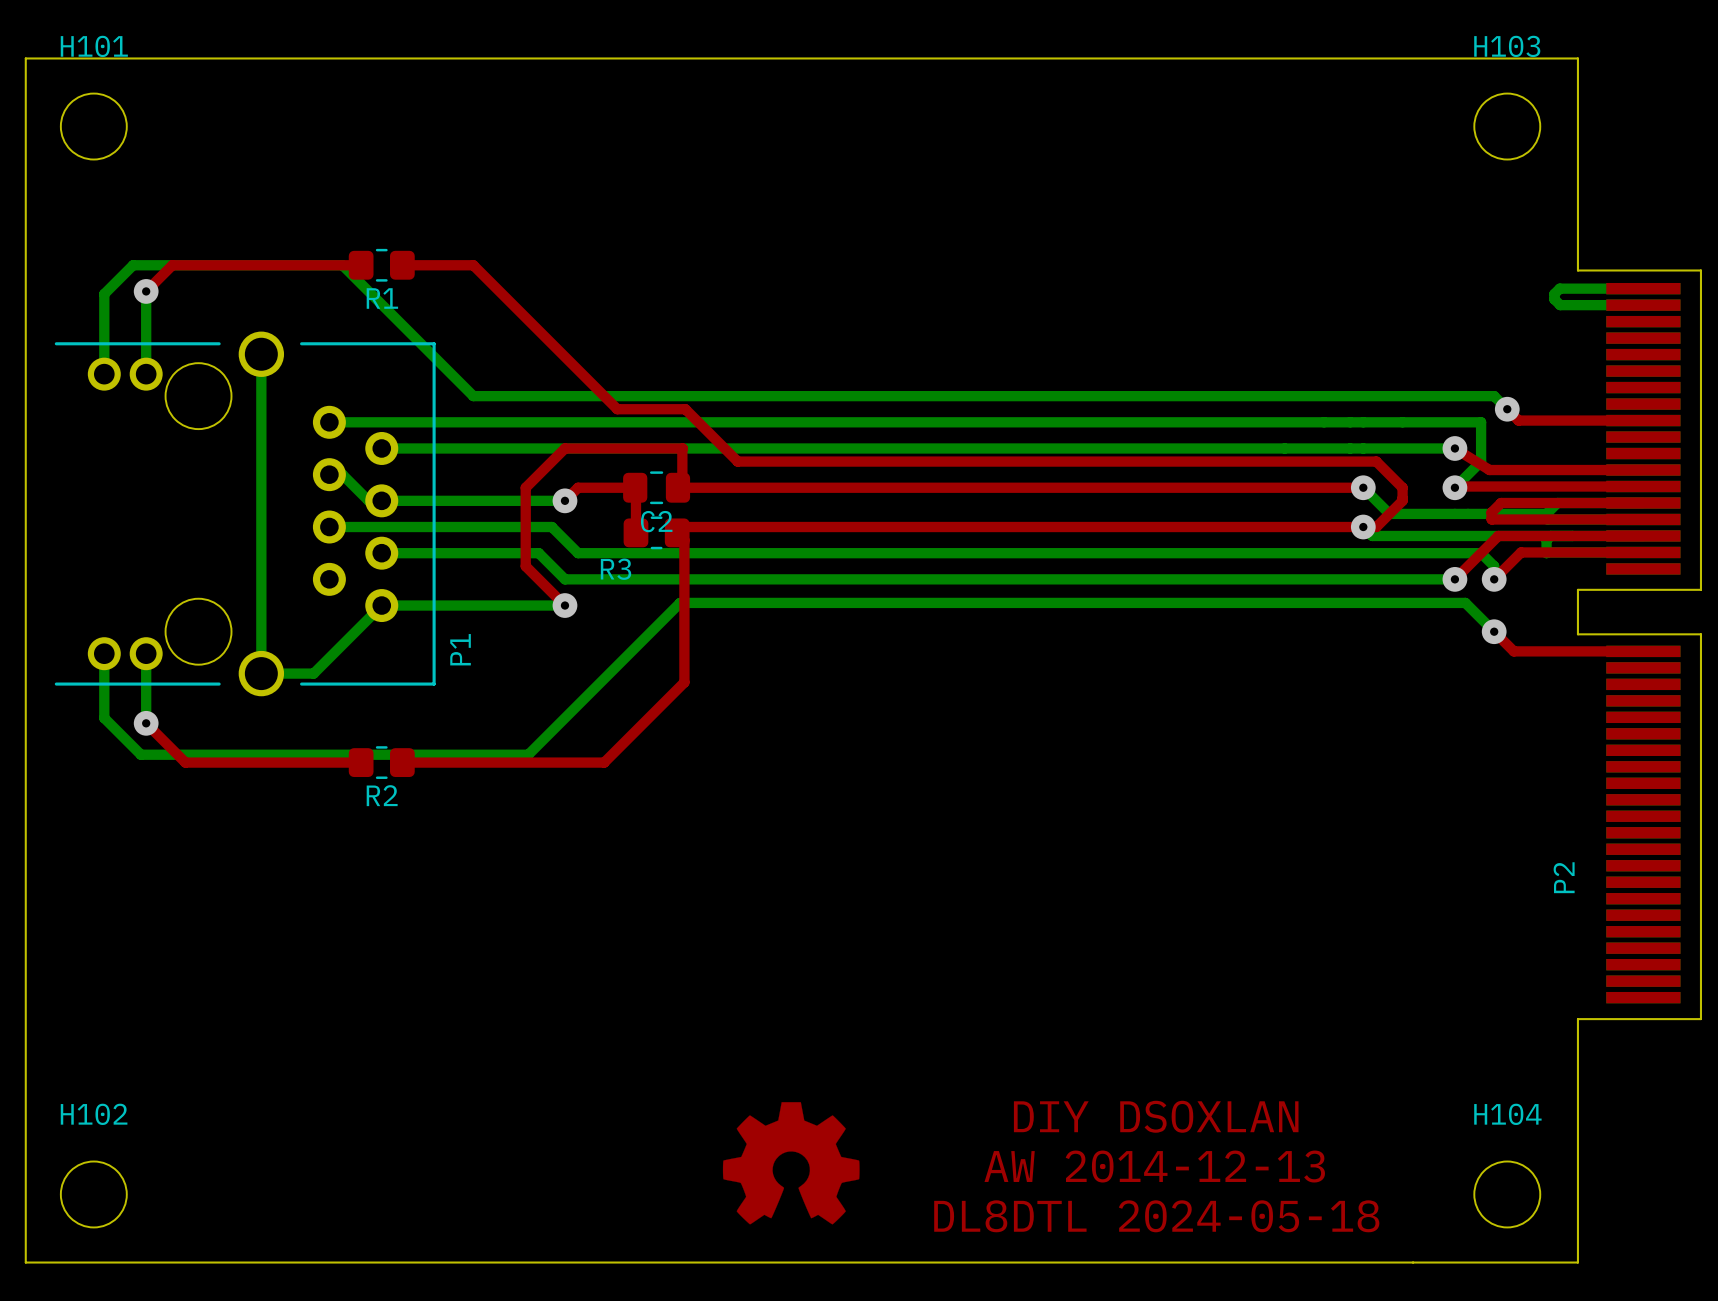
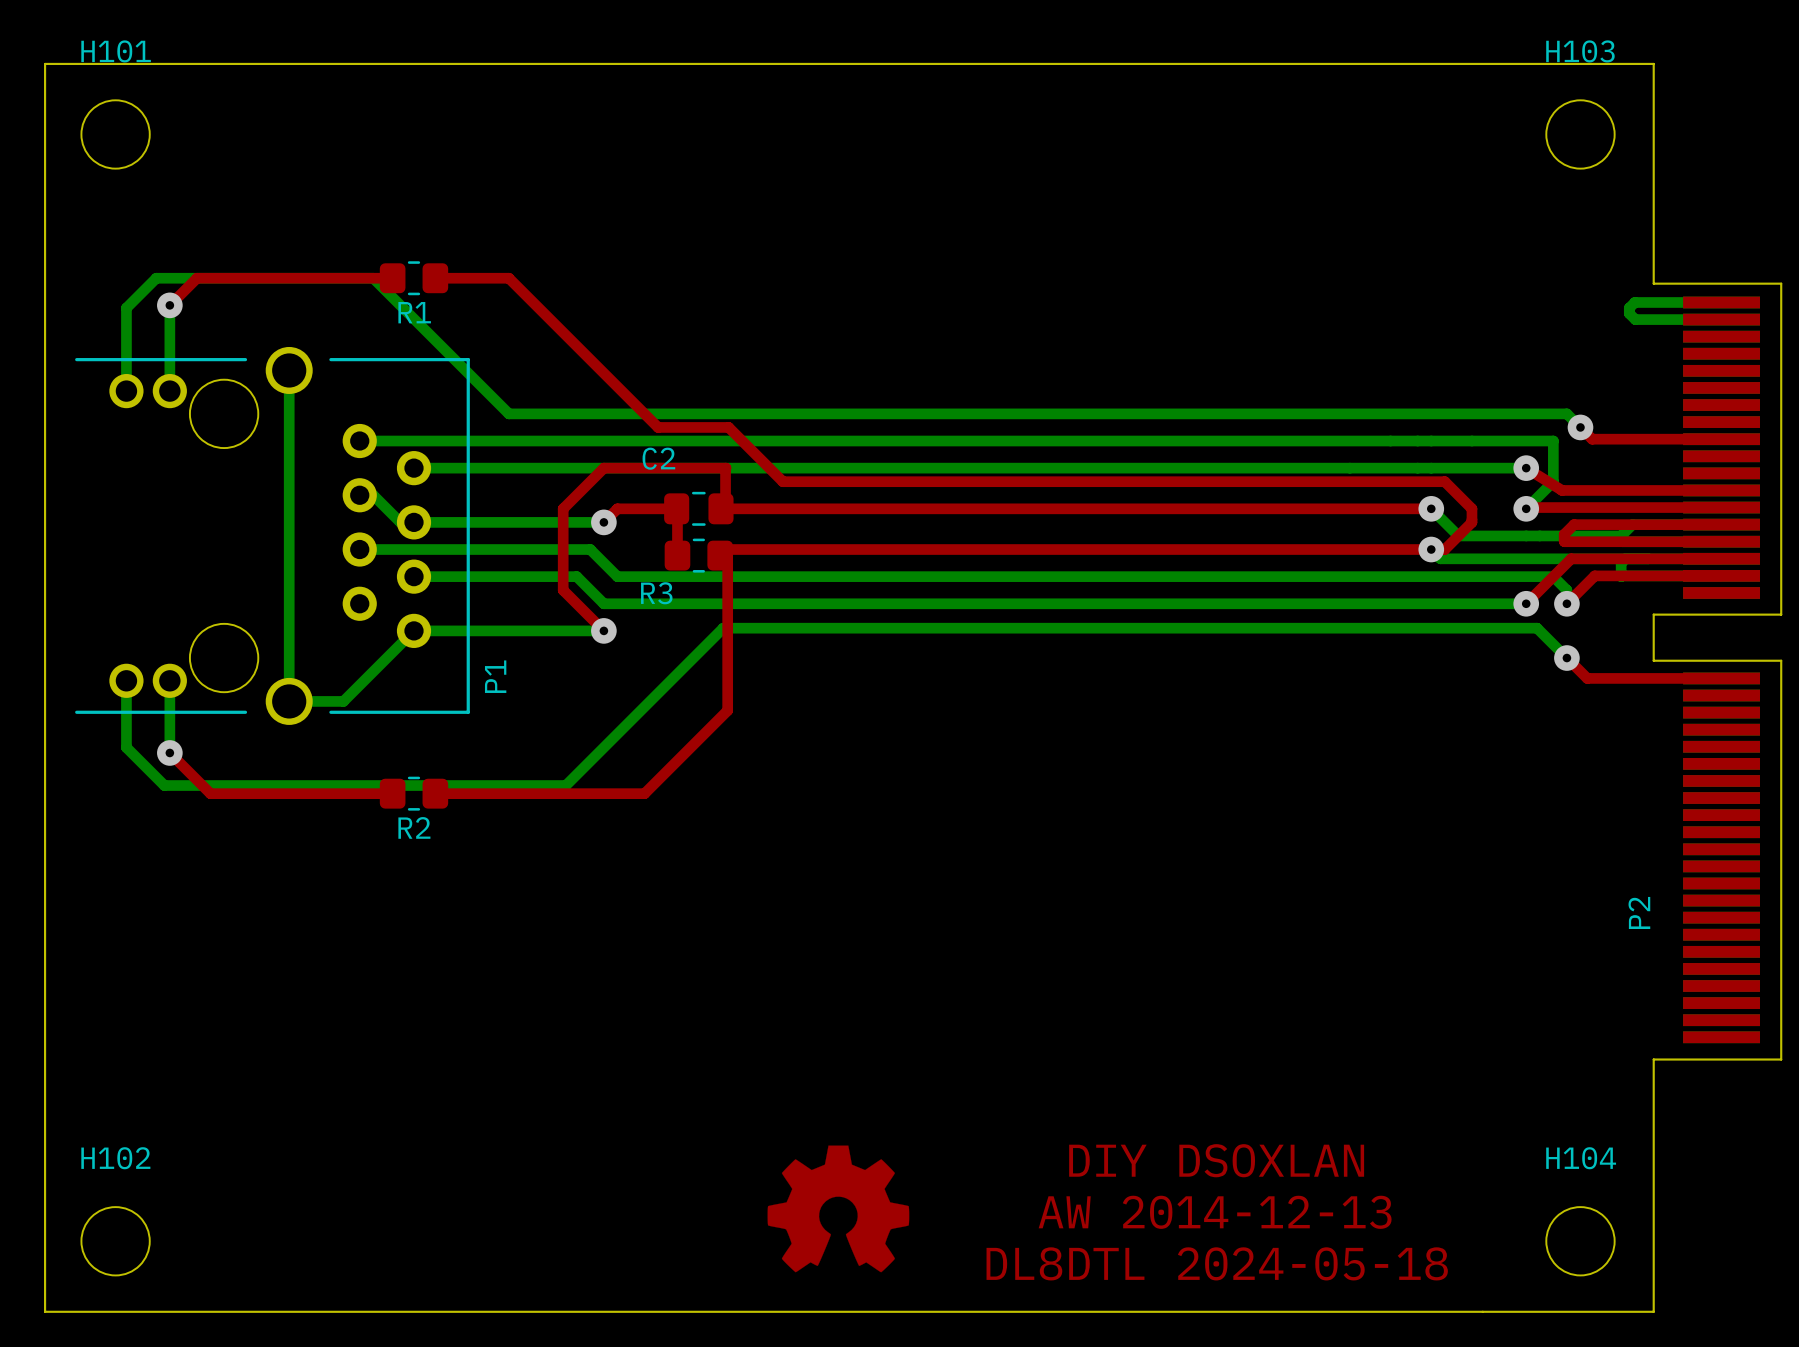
C2 name position: C2 (656, 521) -> C2 (658, 458)

